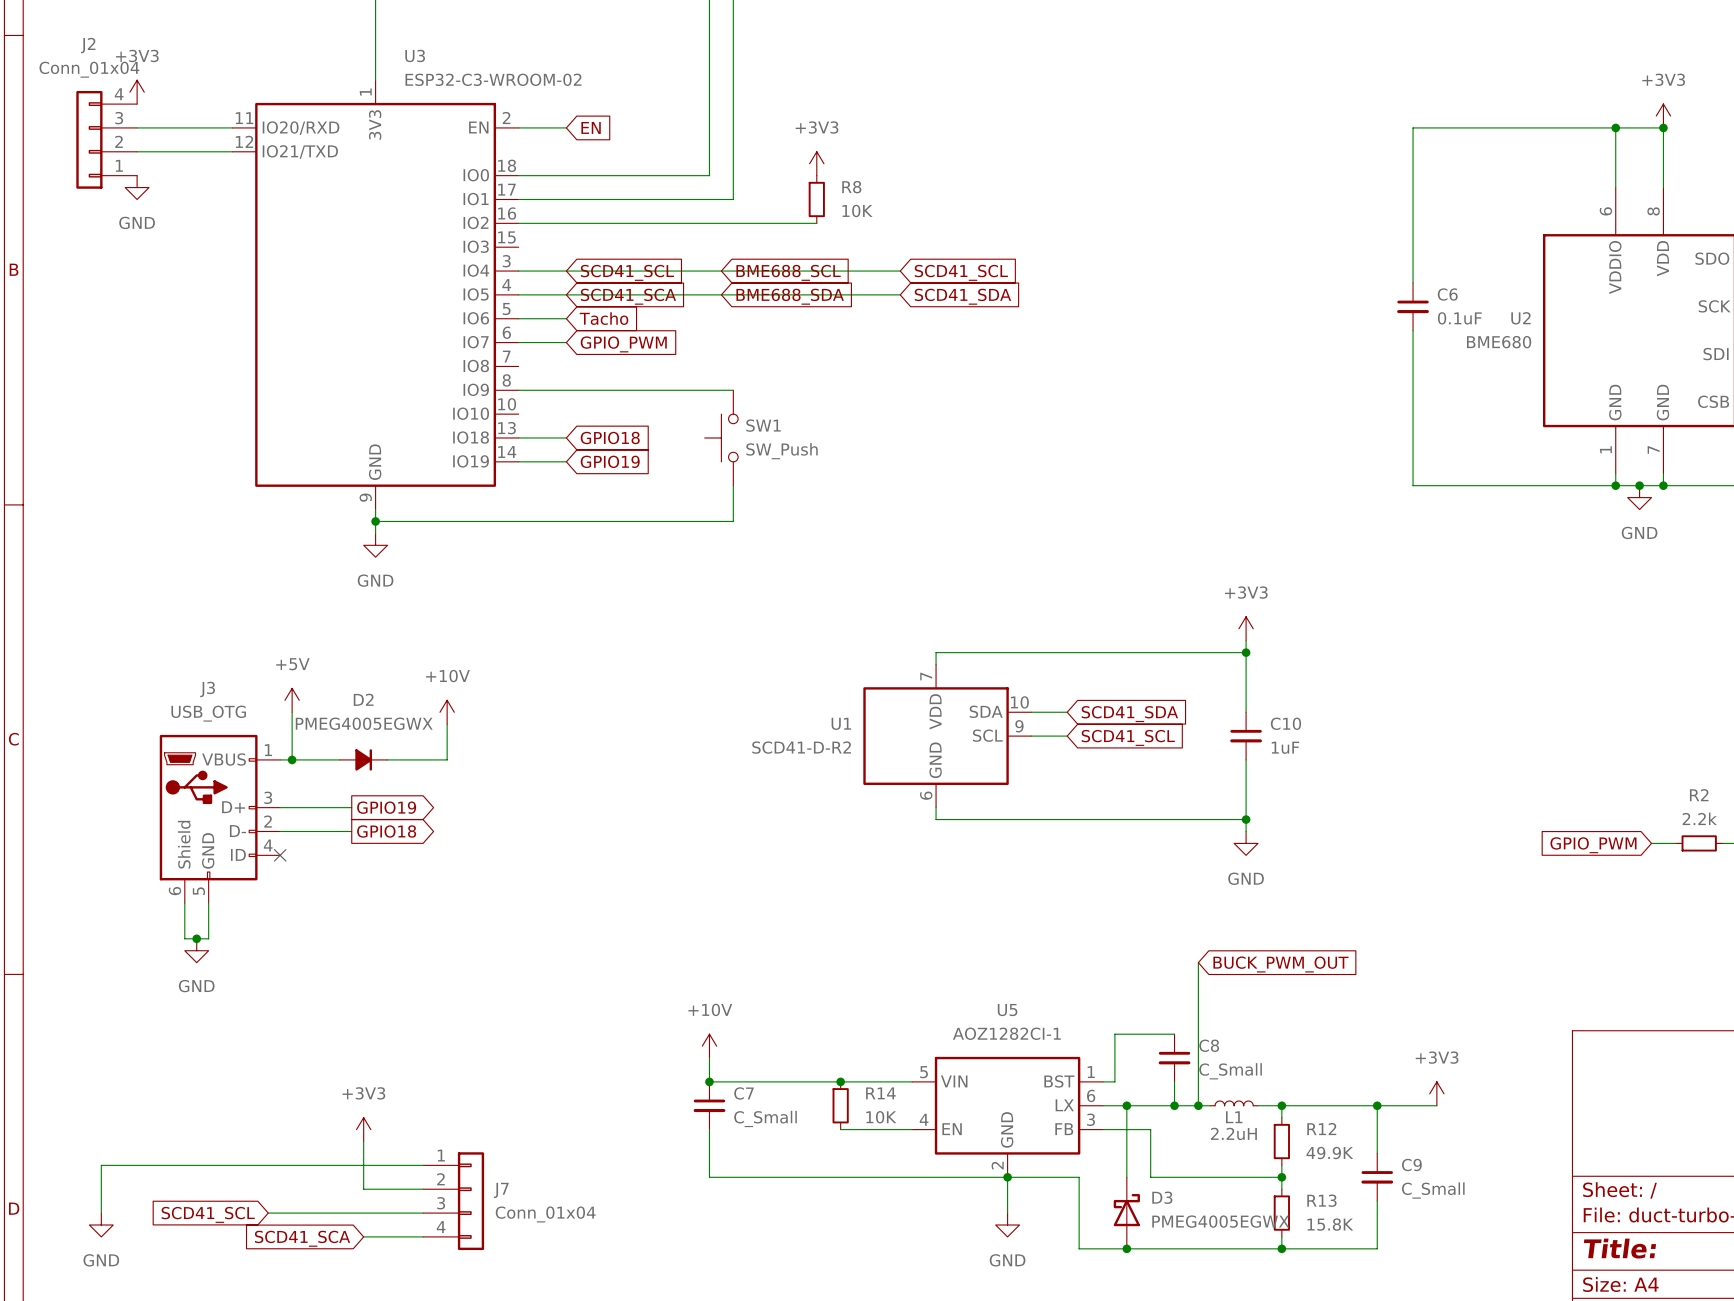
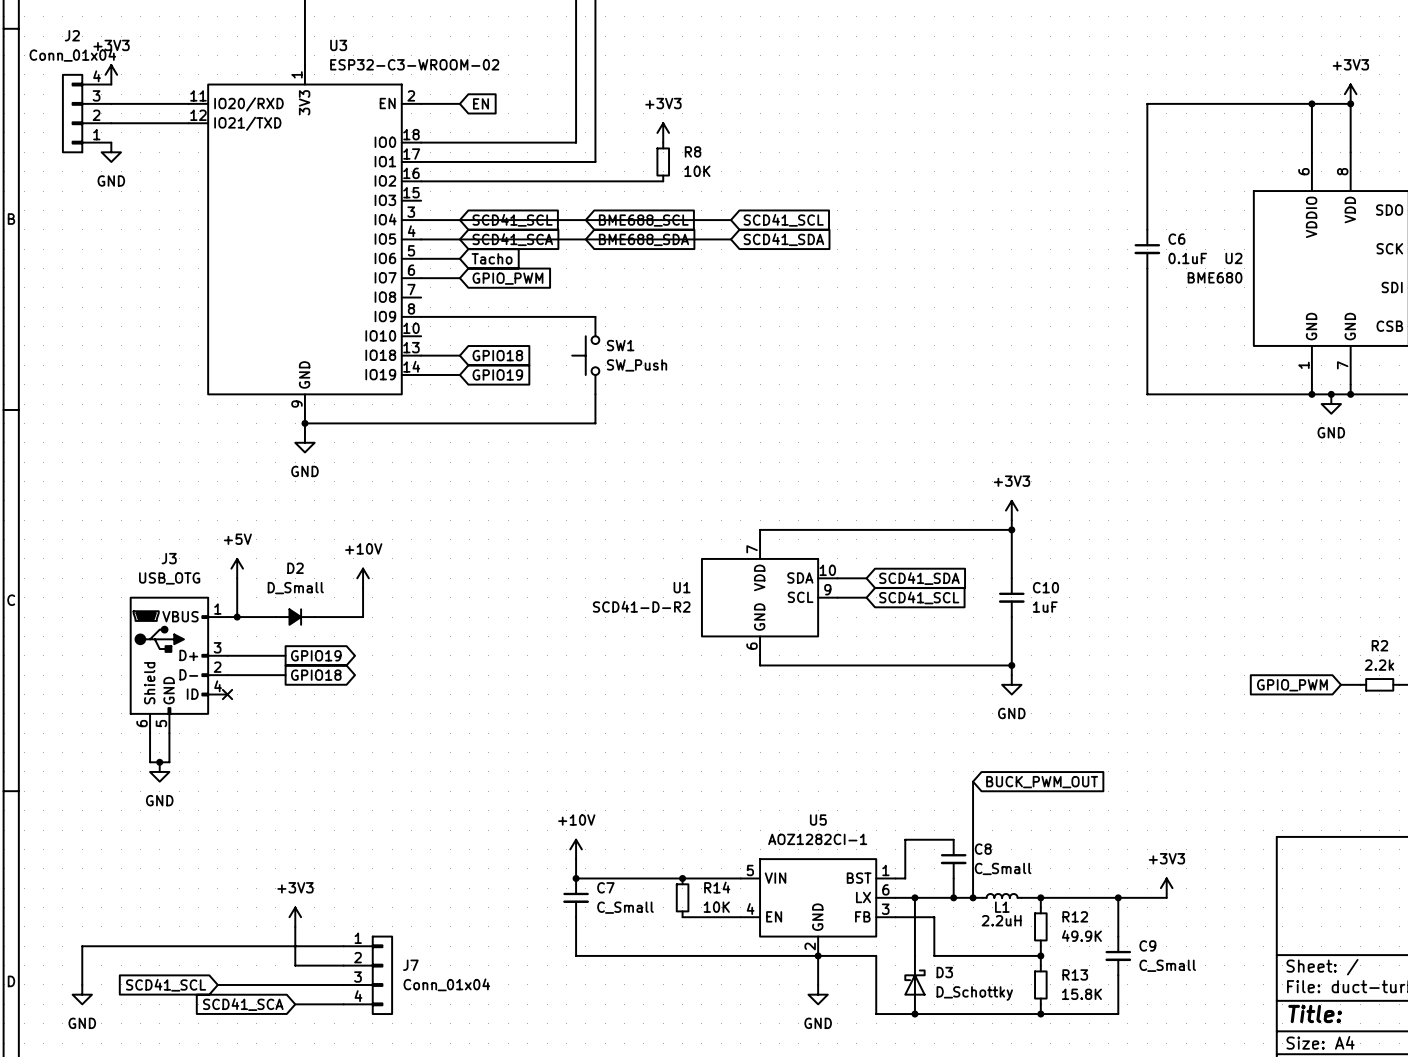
D2 value: PMEG4005EGWX (364, 723) -> D_Small (295, 588)
D3 value: PMEG4005EGWX (1220, 1221) -> D_Schottky (974, 993)

